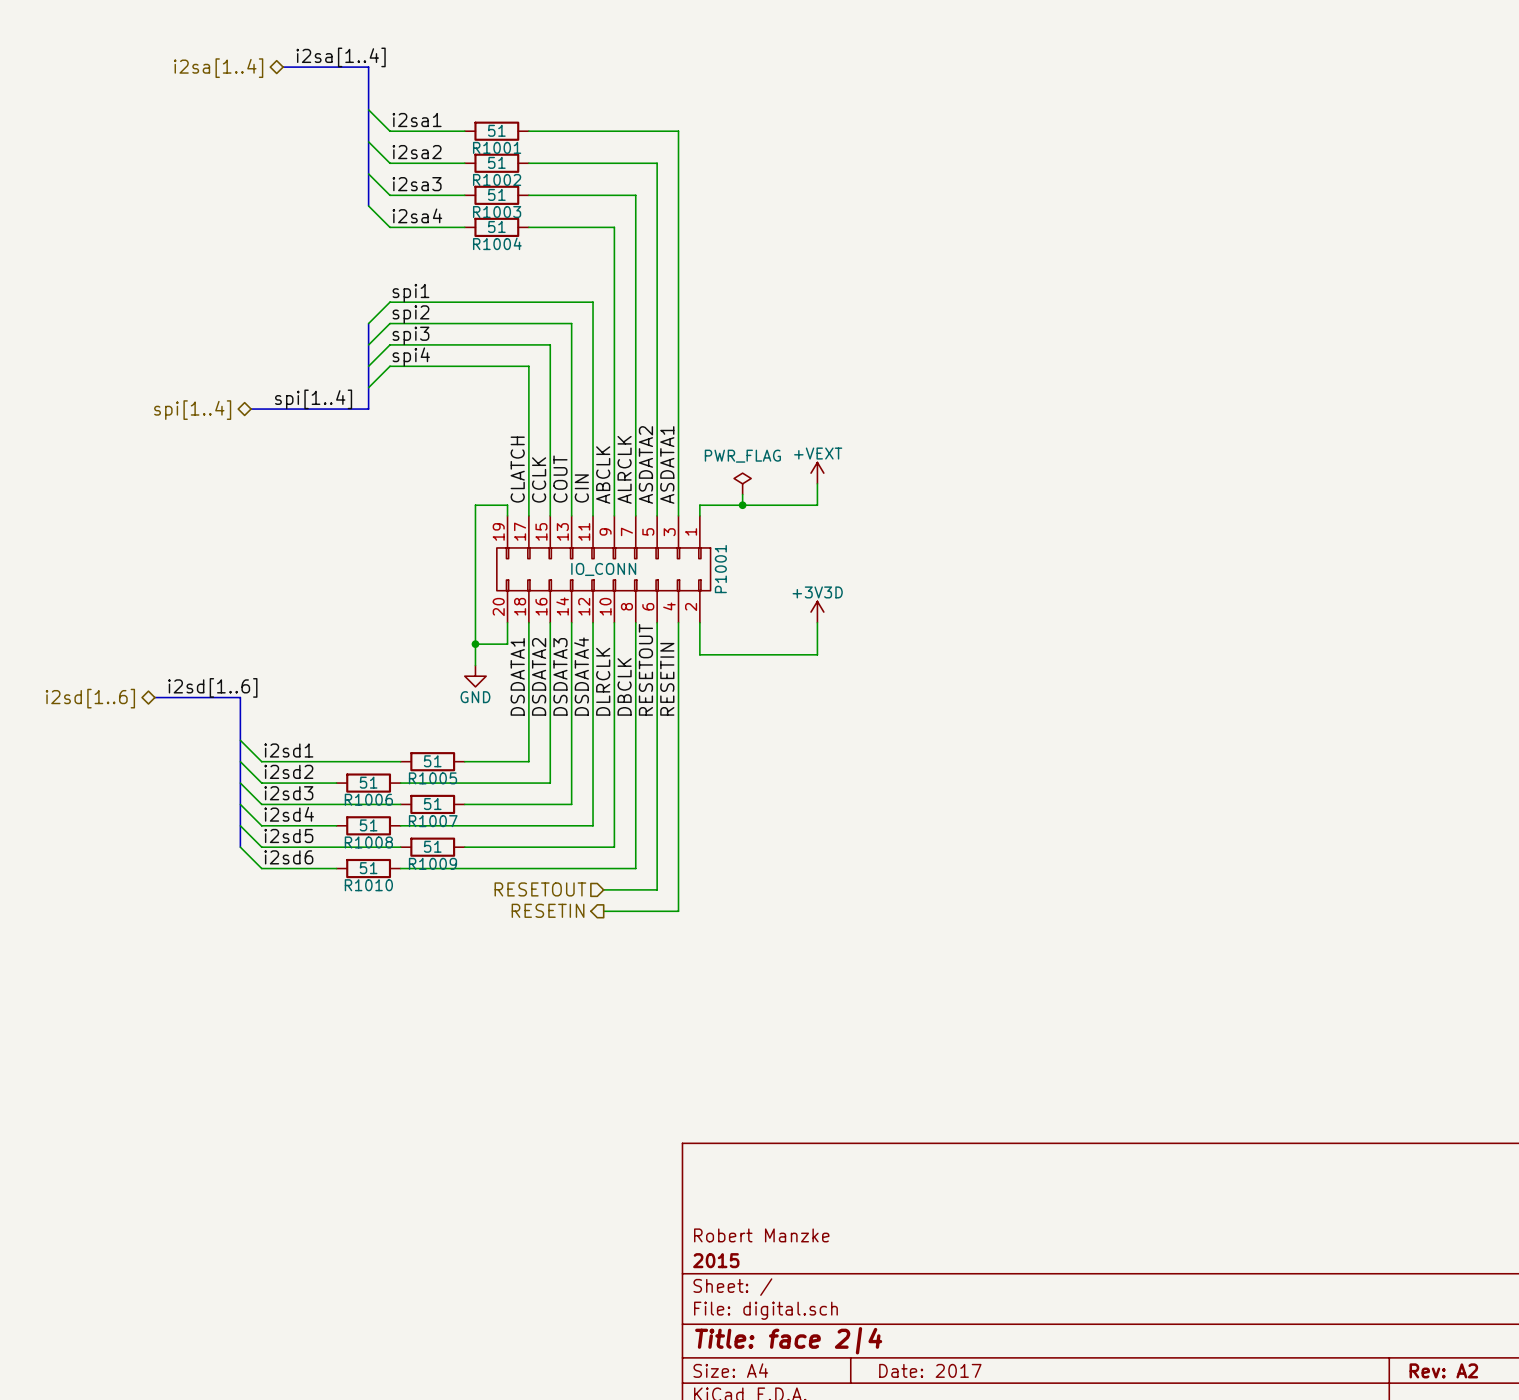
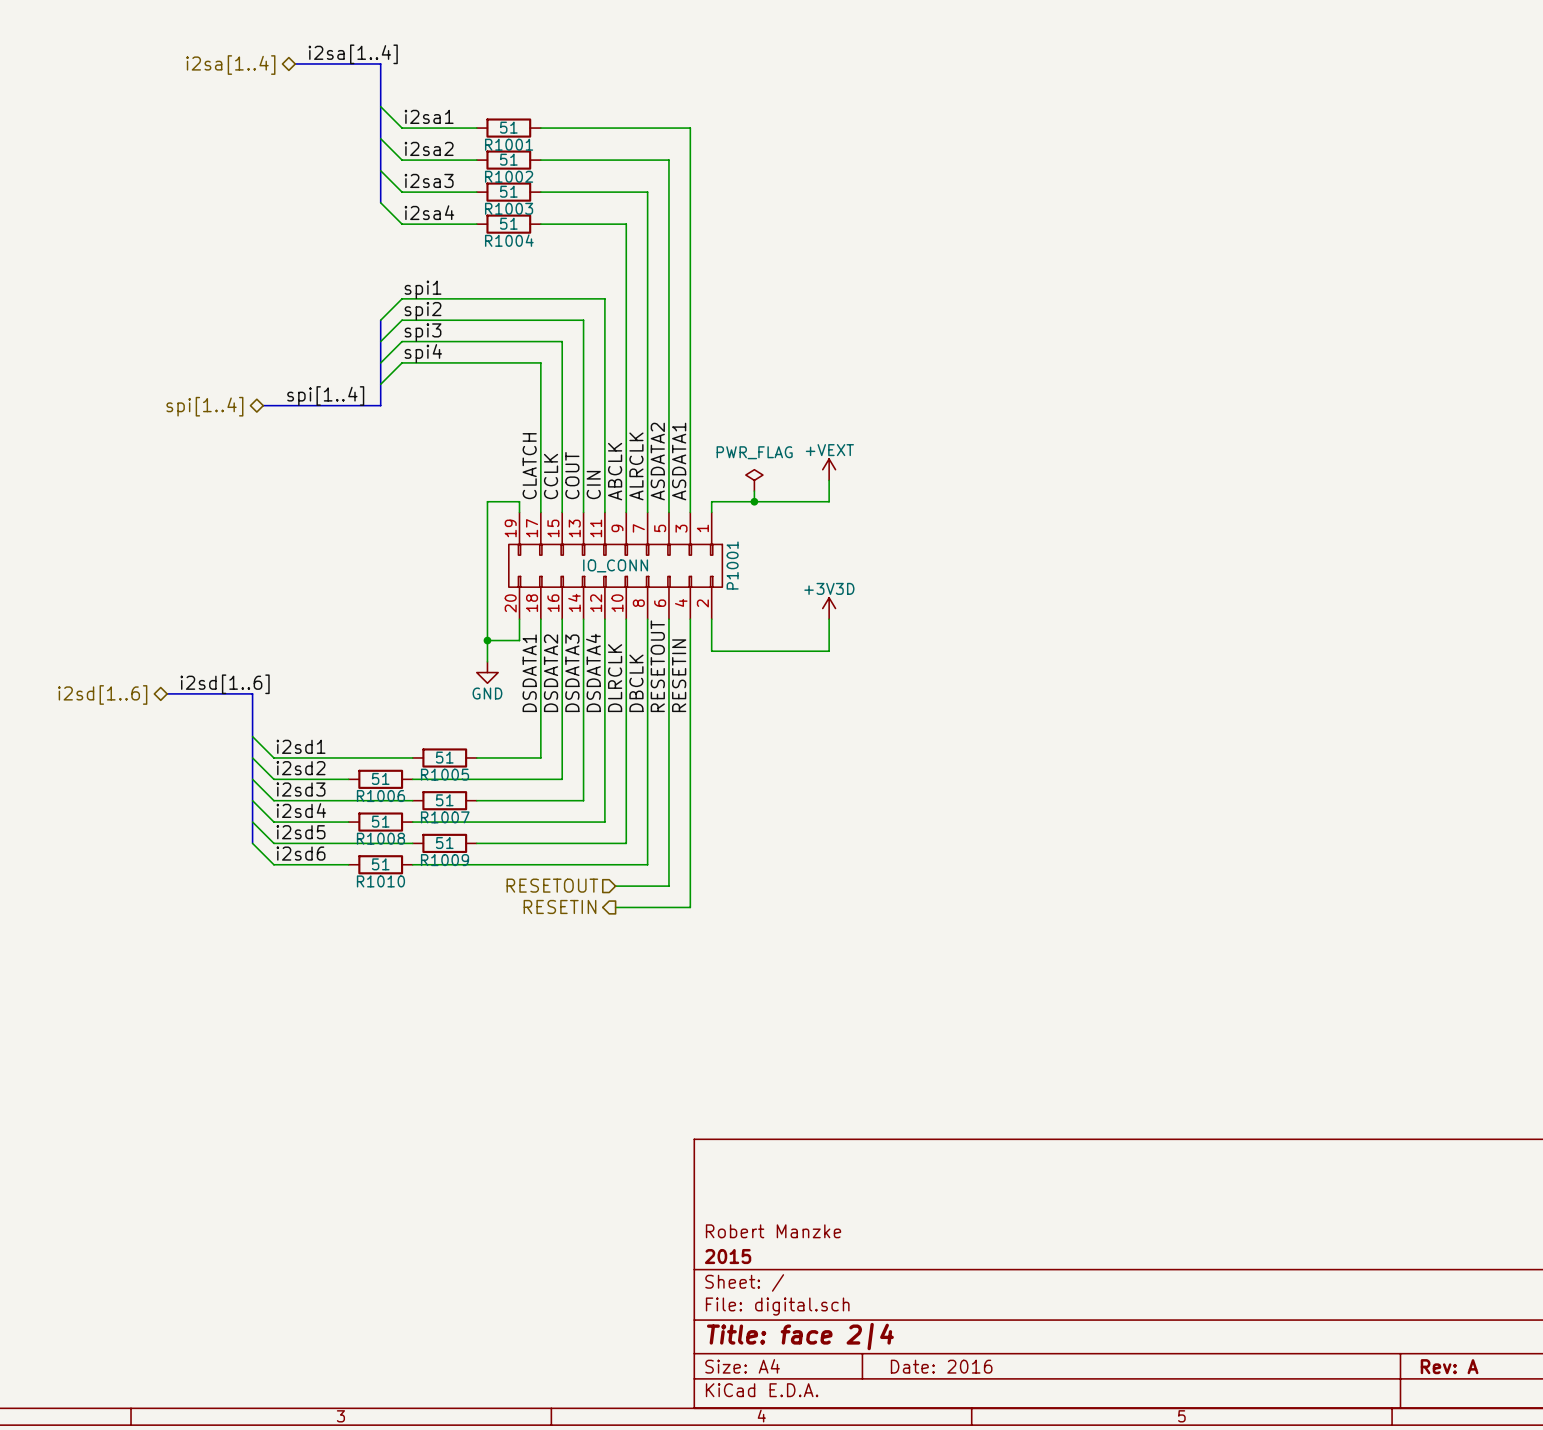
title block: Date: 2017 (930, 1370) -> Date: 2016 (941, 1366)
title block: Rev: A2 (1443, 1370) -> Rev: A (1449, 1366)

